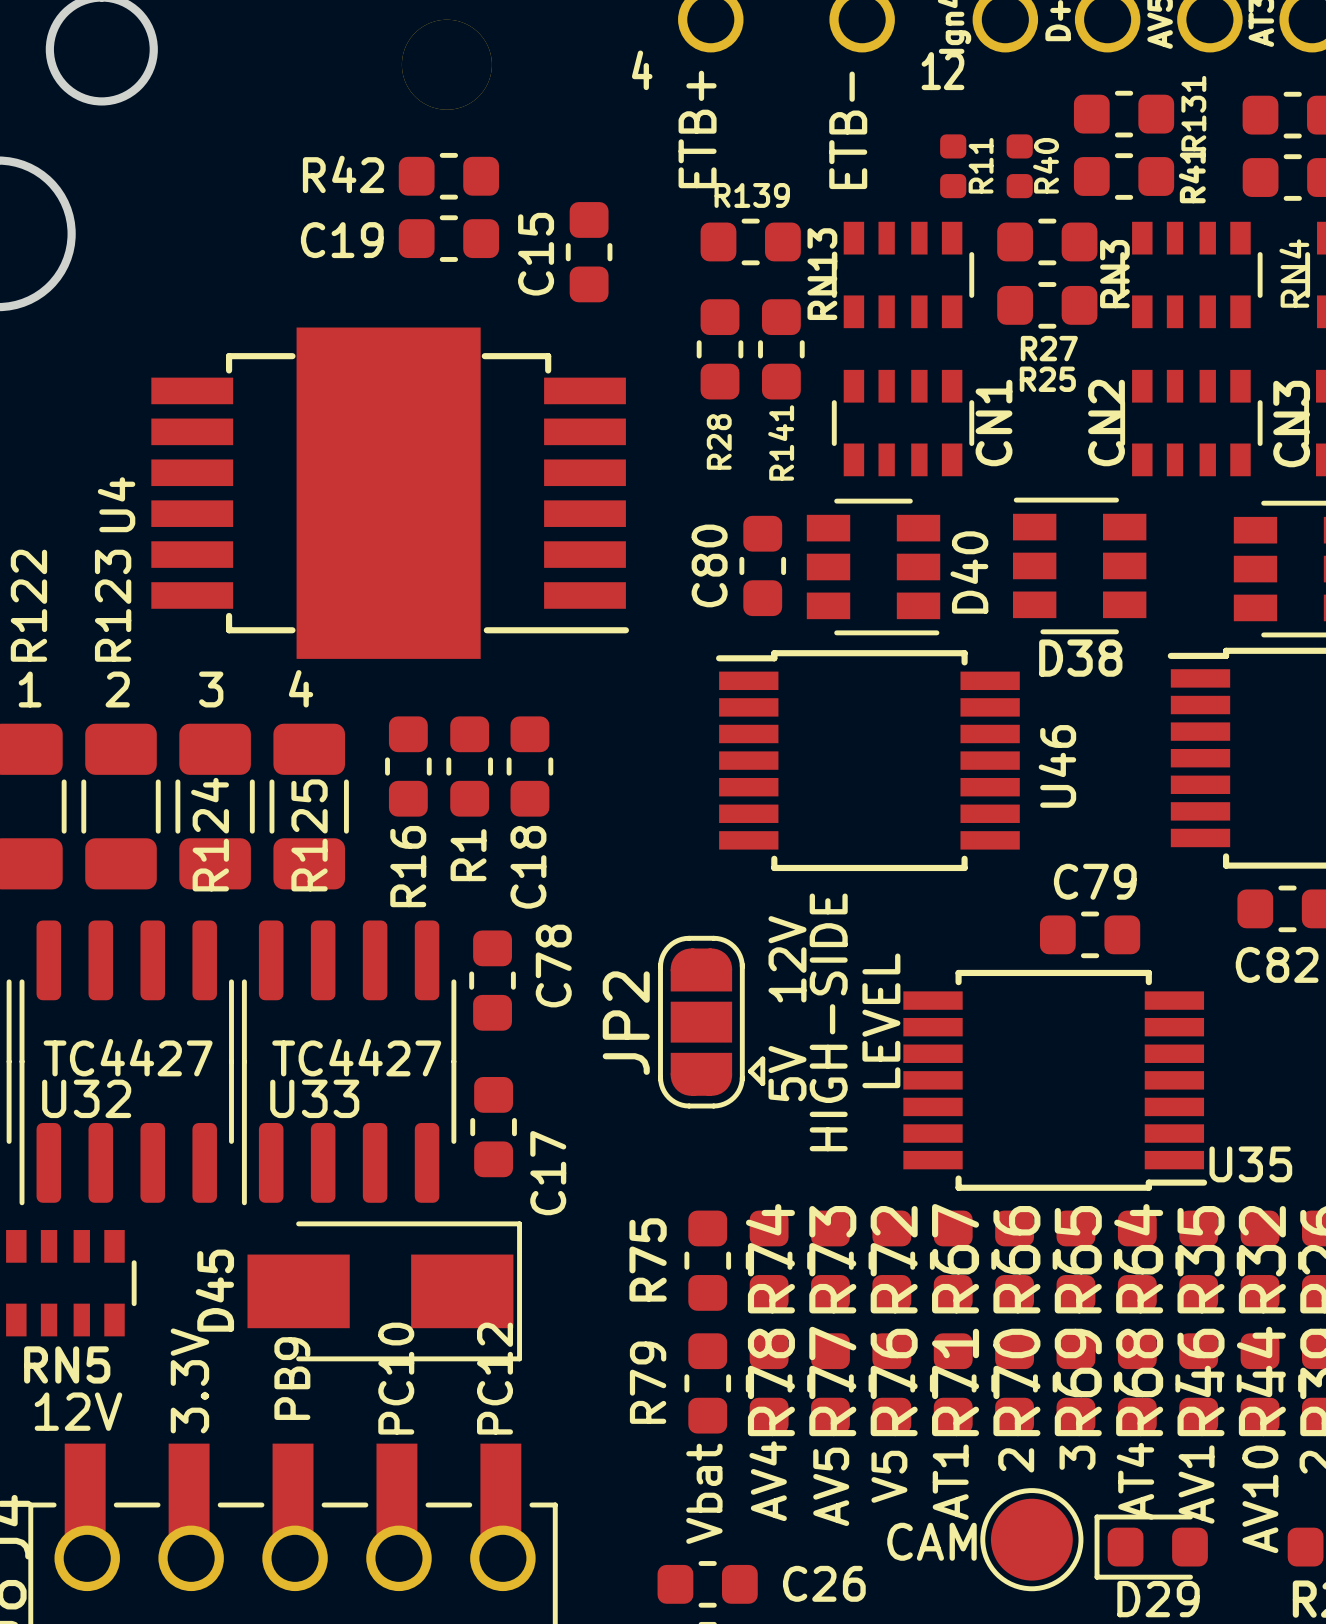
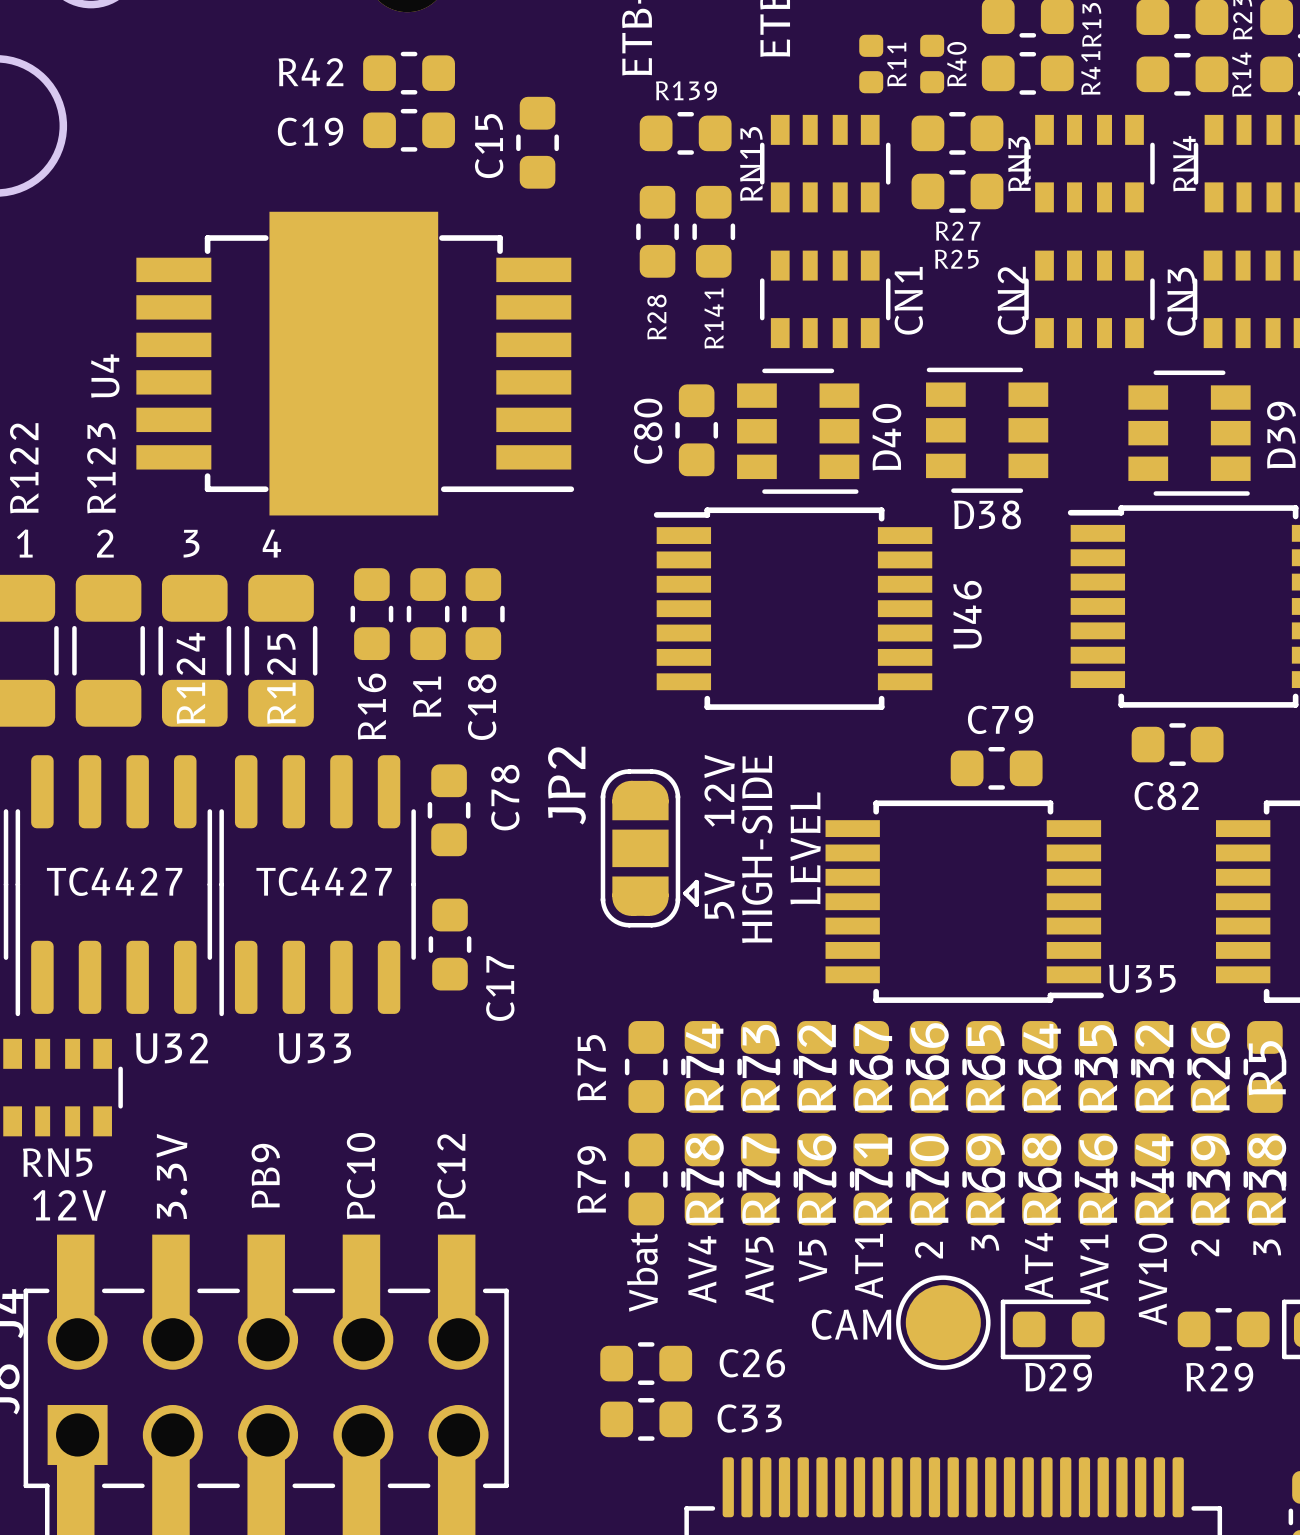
JP2 name position: JP2 (626, 1023) -> JP2 (566, 785)
U32 name position: U32 (86, 1098) -> U32 (171, 1048)
U33 name position: U33 (314, 1098) -> U33 (314, 1048)
D45: (384, 1291) -> none

